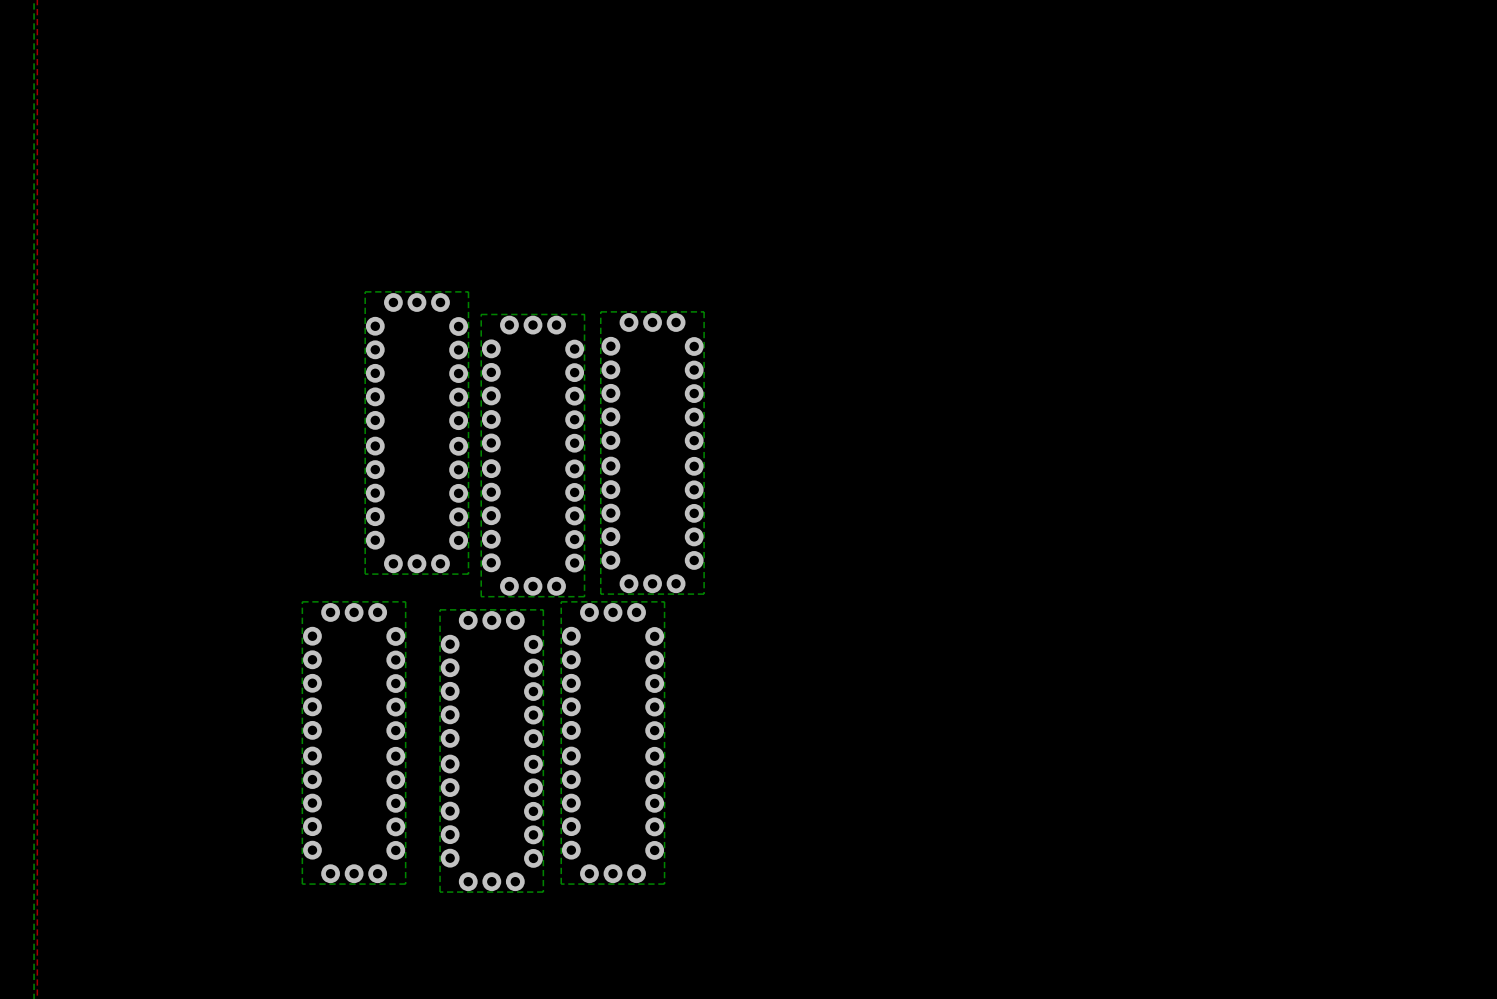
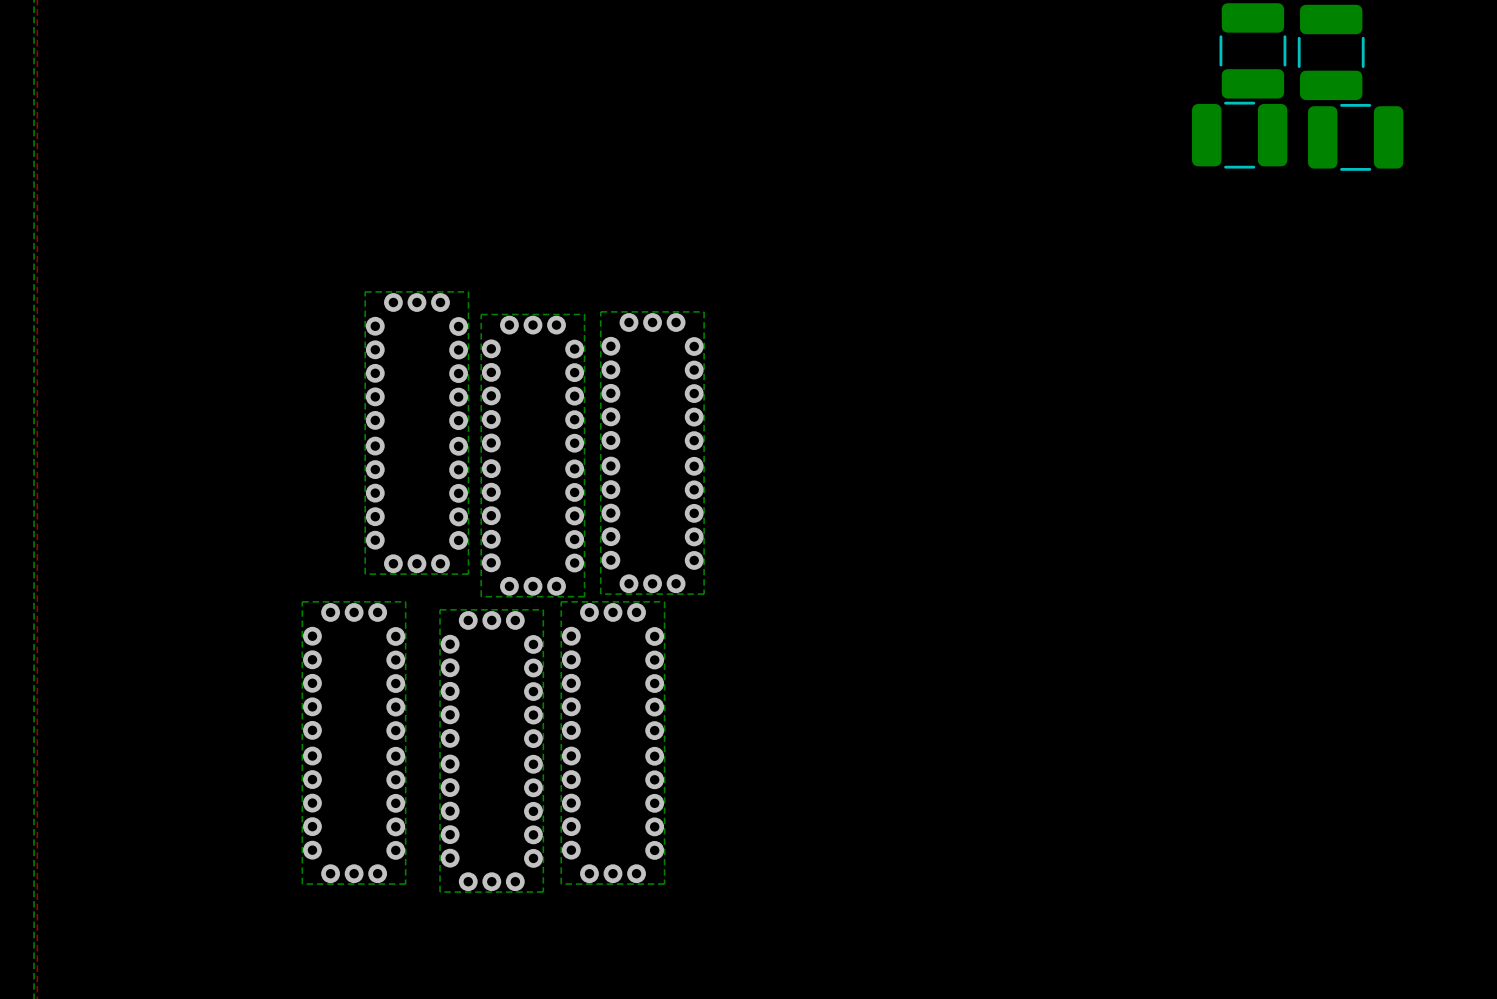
part: none -> (1252, 50)
part: none -> (1331, 52)
part: none -> (1239, 135)
part: none -> (1355, 137)

